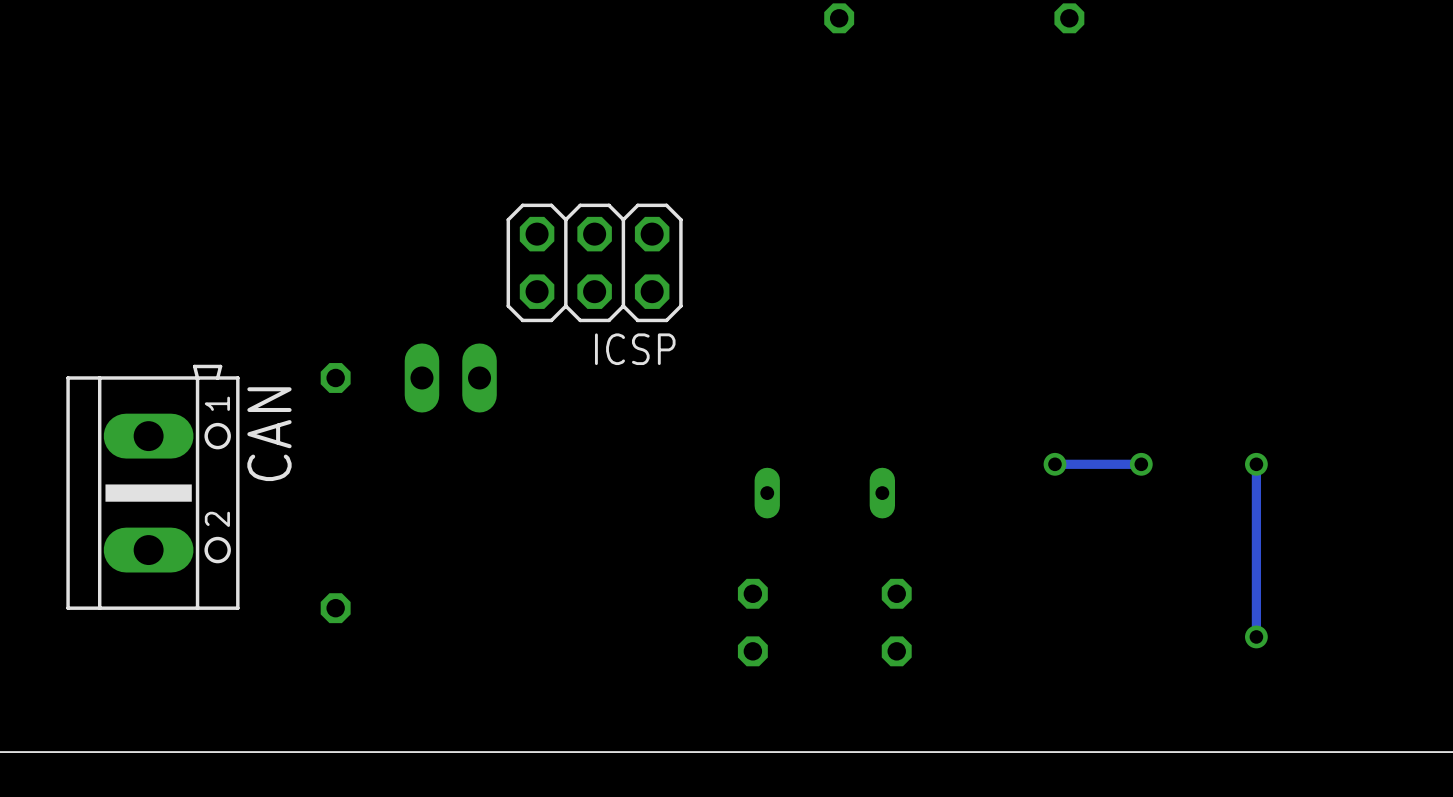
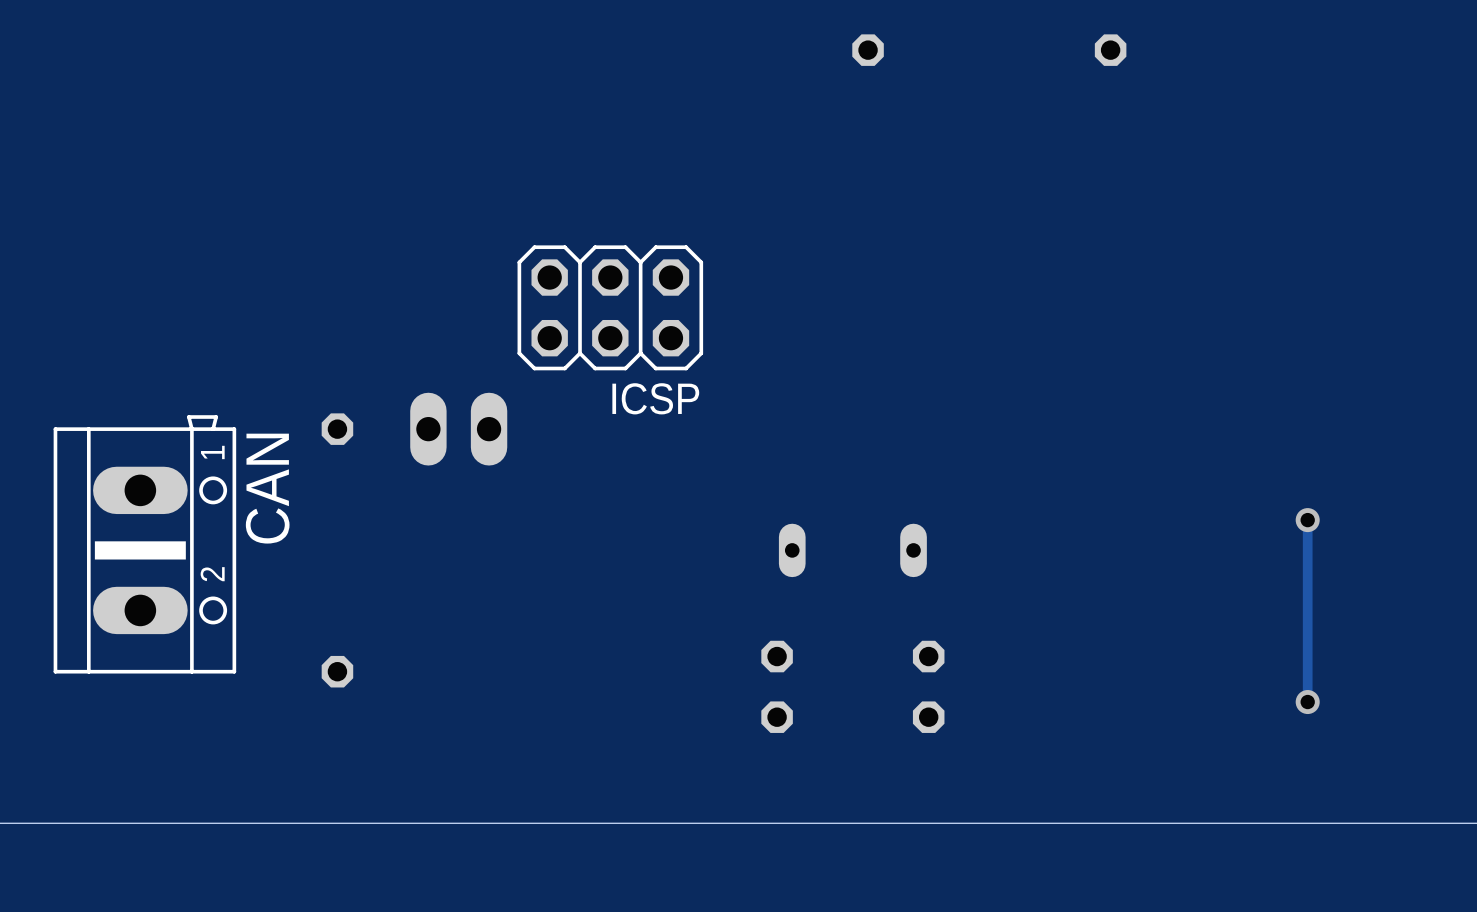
via: (1054, 464) -> none
track: (1141, 464) (1054, 464) -> none
via: (1141, 464) -> none

